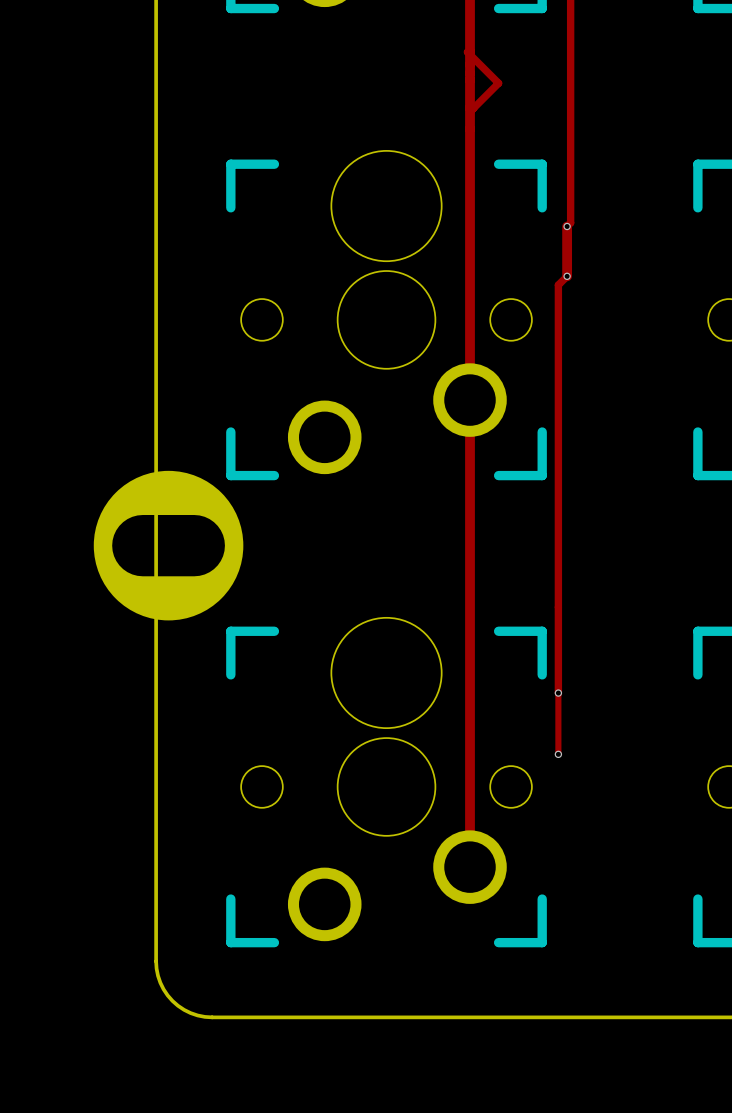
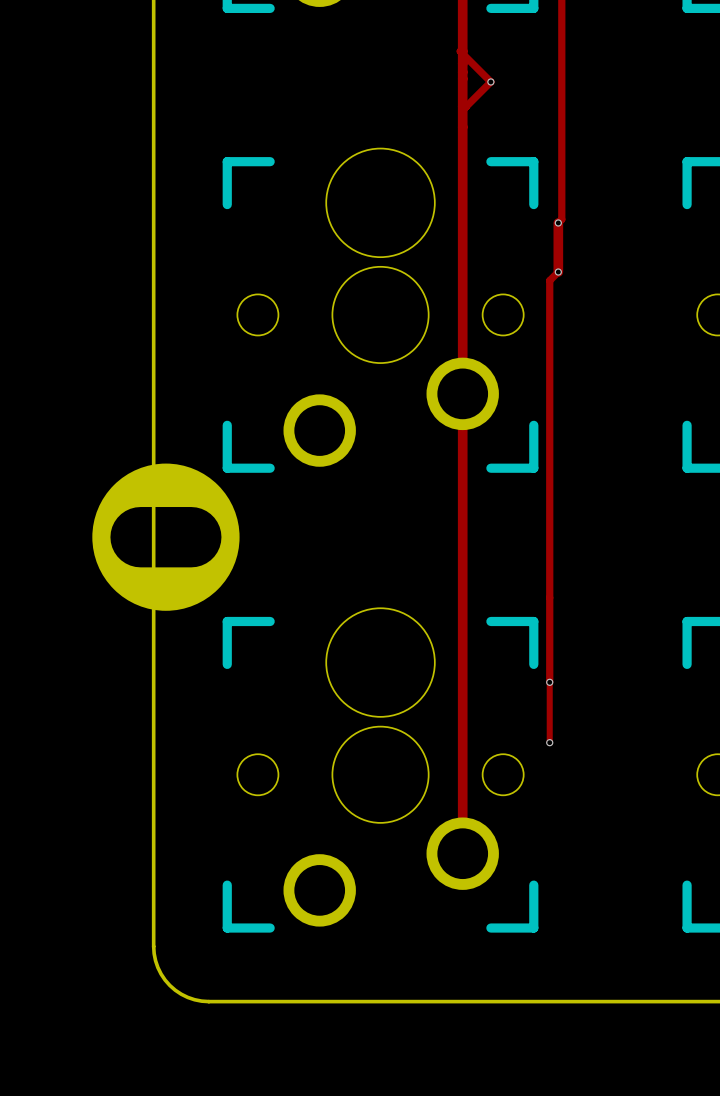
via: none -> (490, 81)

